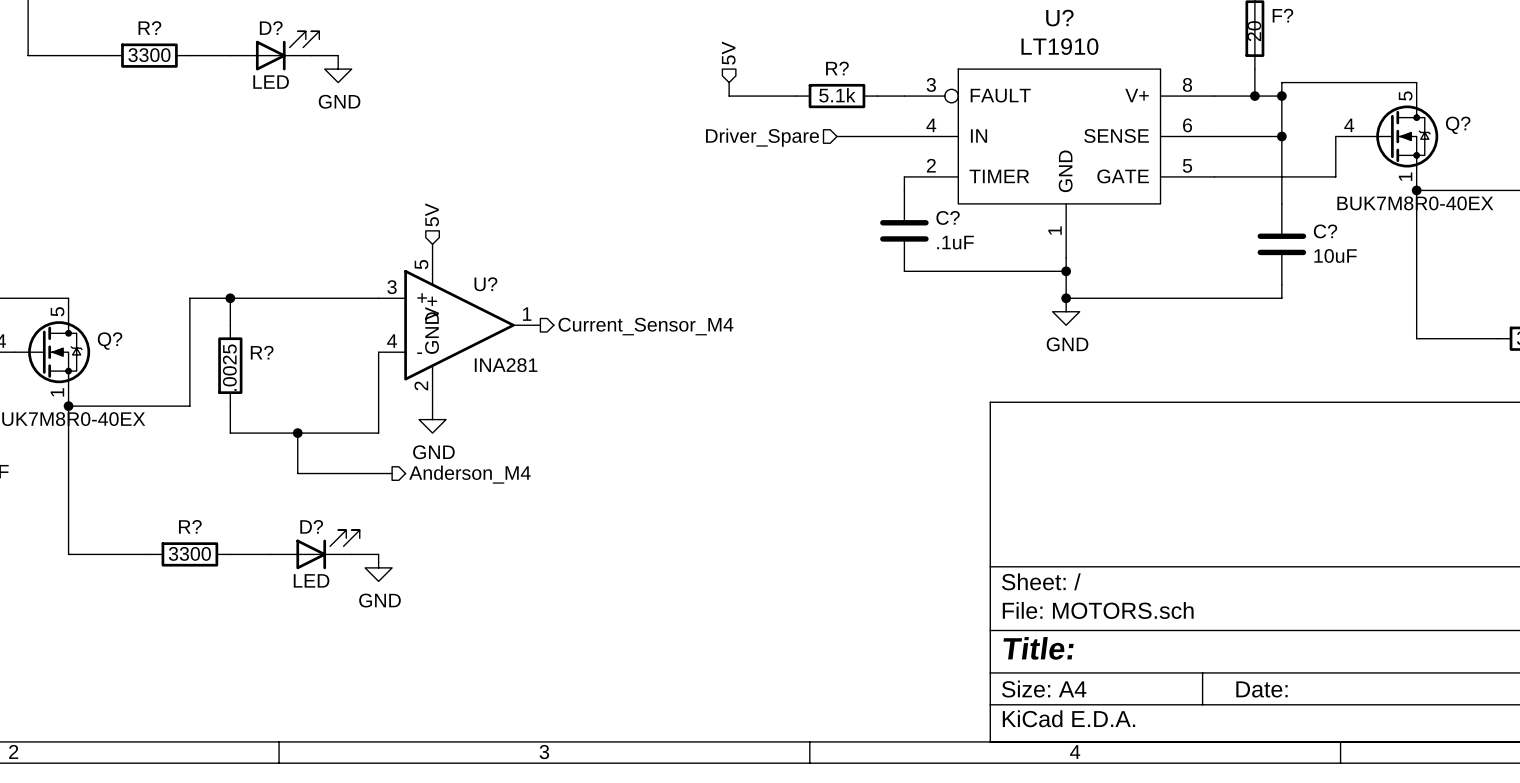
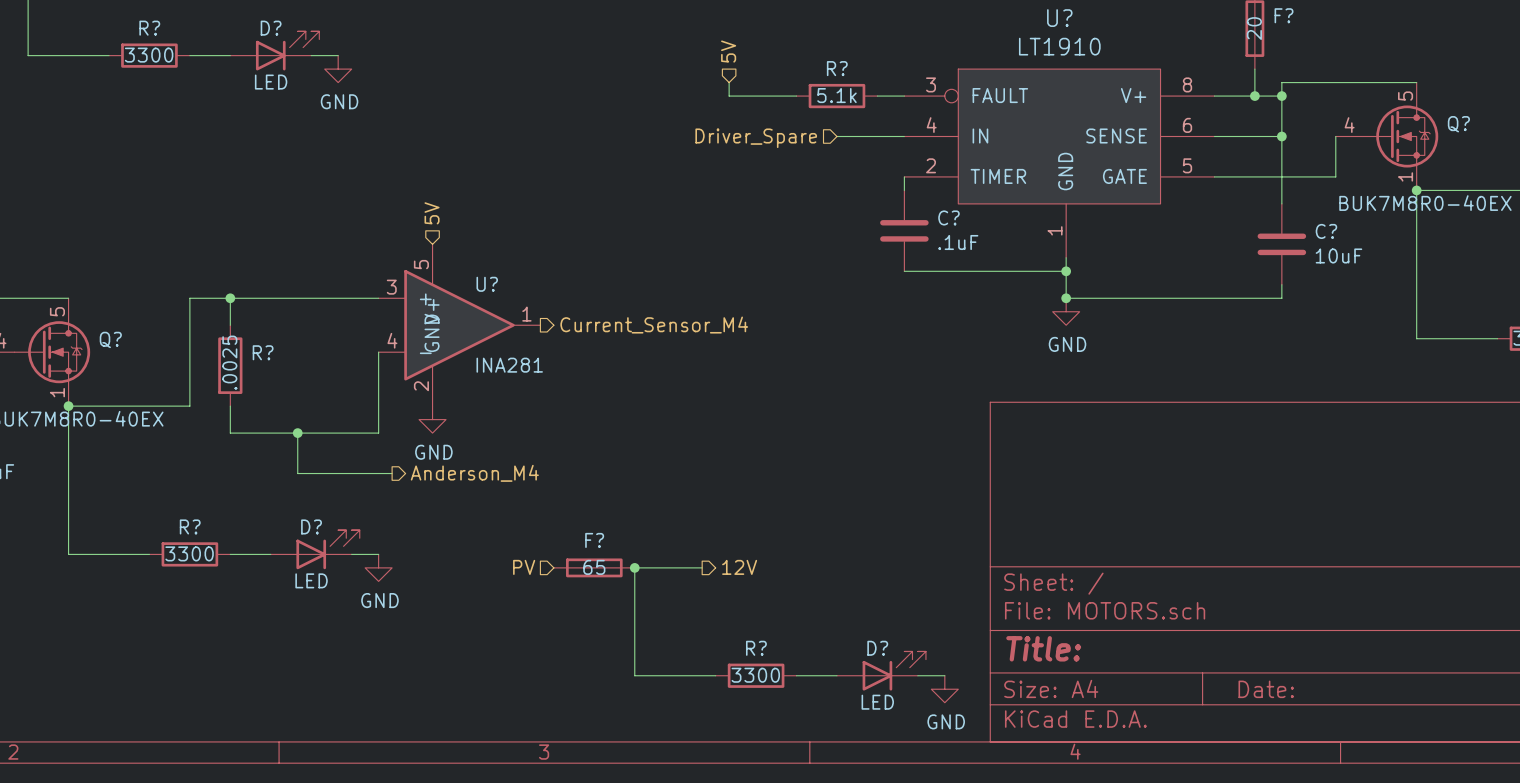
hierarchical label: none -> PV (524, 567)
F?: none -> 65 (594, 567)
junction: none -> (634, 567)
wire: none -> (702, 567) (634, 567) (634, 675) (715, 675)
hierarchical label: none -> 12V (739, 567)
D?: none -> LED (881, 671)
R?: none -> 3300 (756, 675)
wire: none -> (796, 675) (836, 675)
wire: none -> (917, 675) (944, 675)
power symbol: none -> GND (944, 689)

